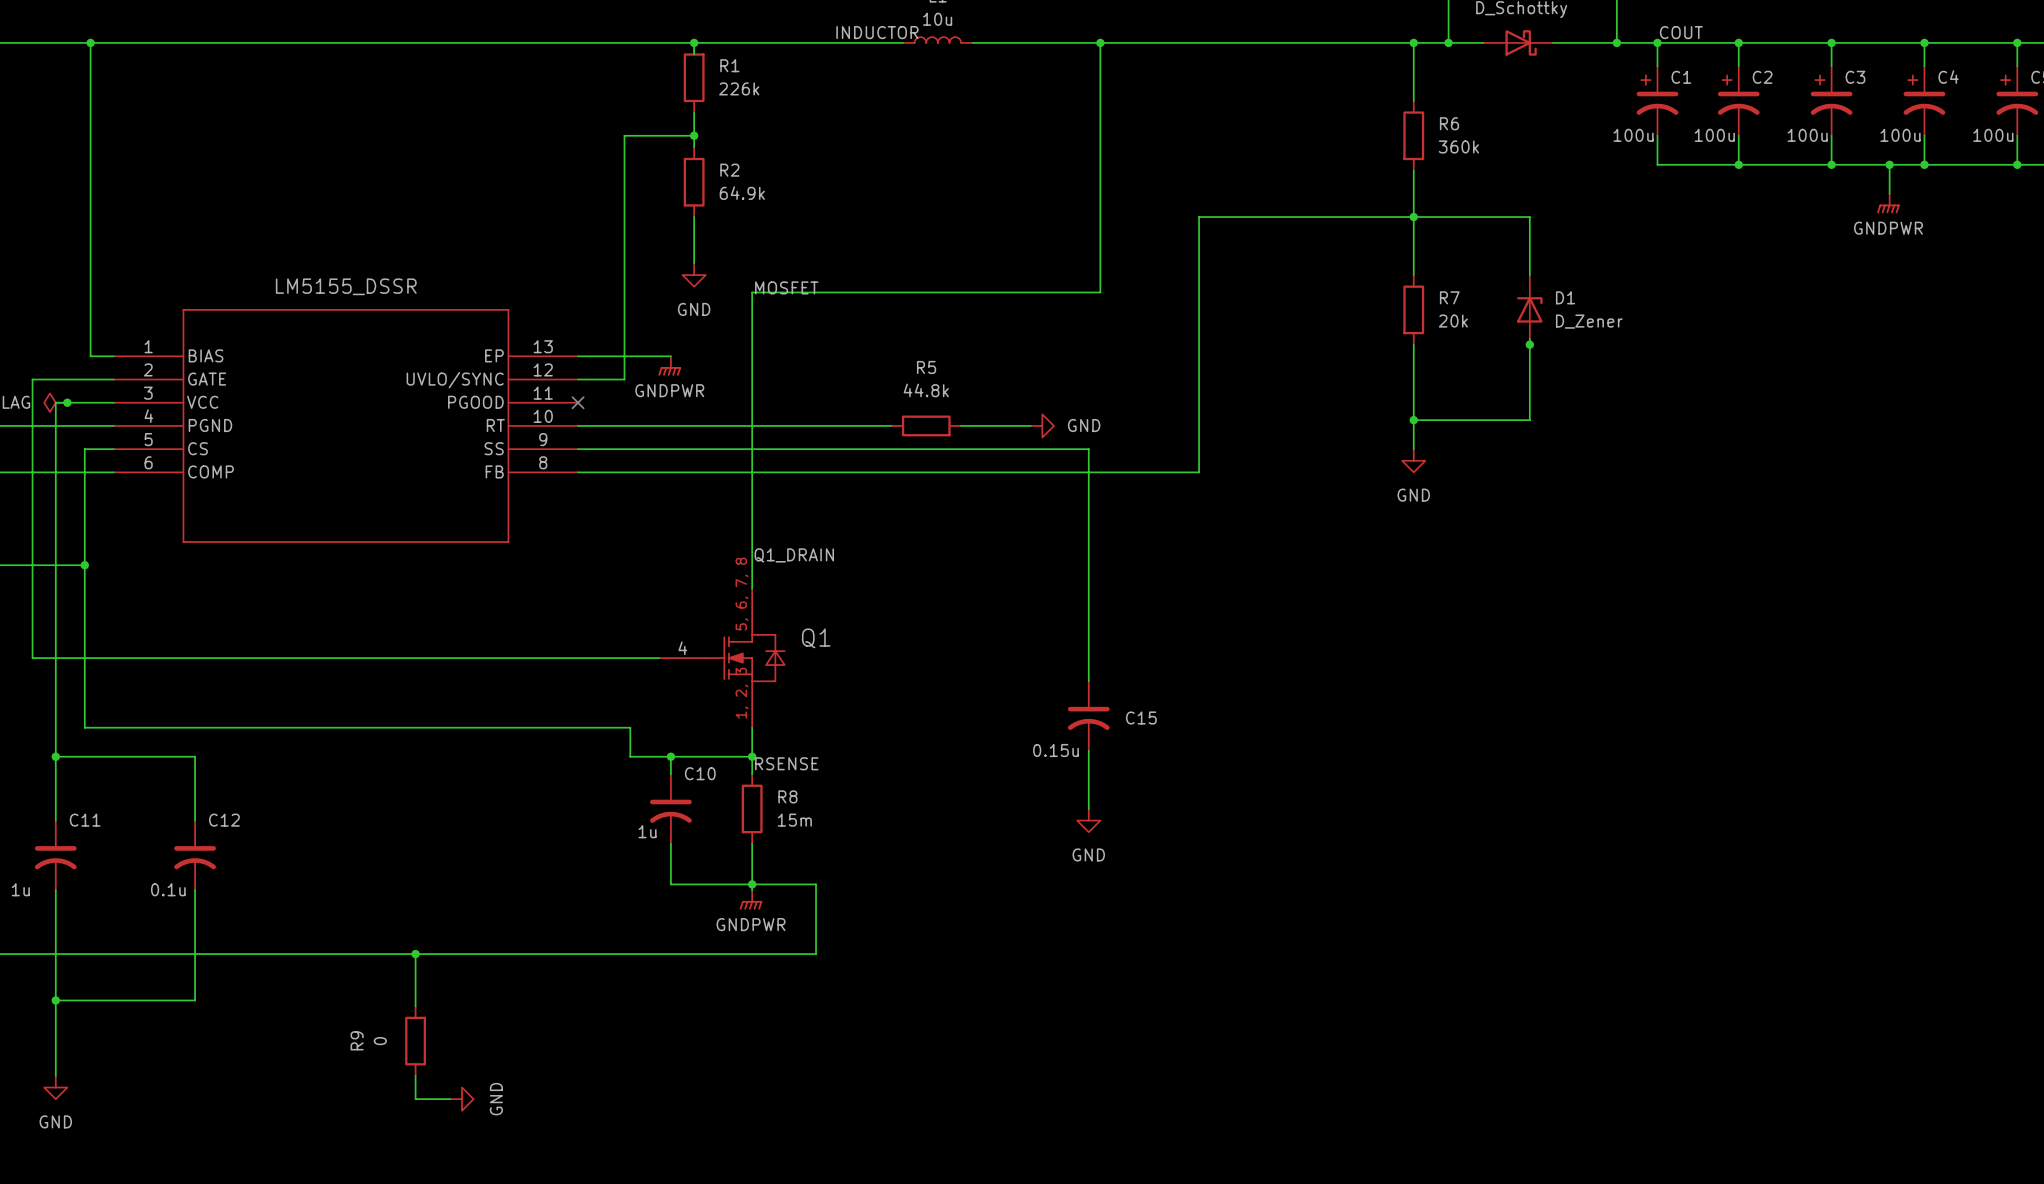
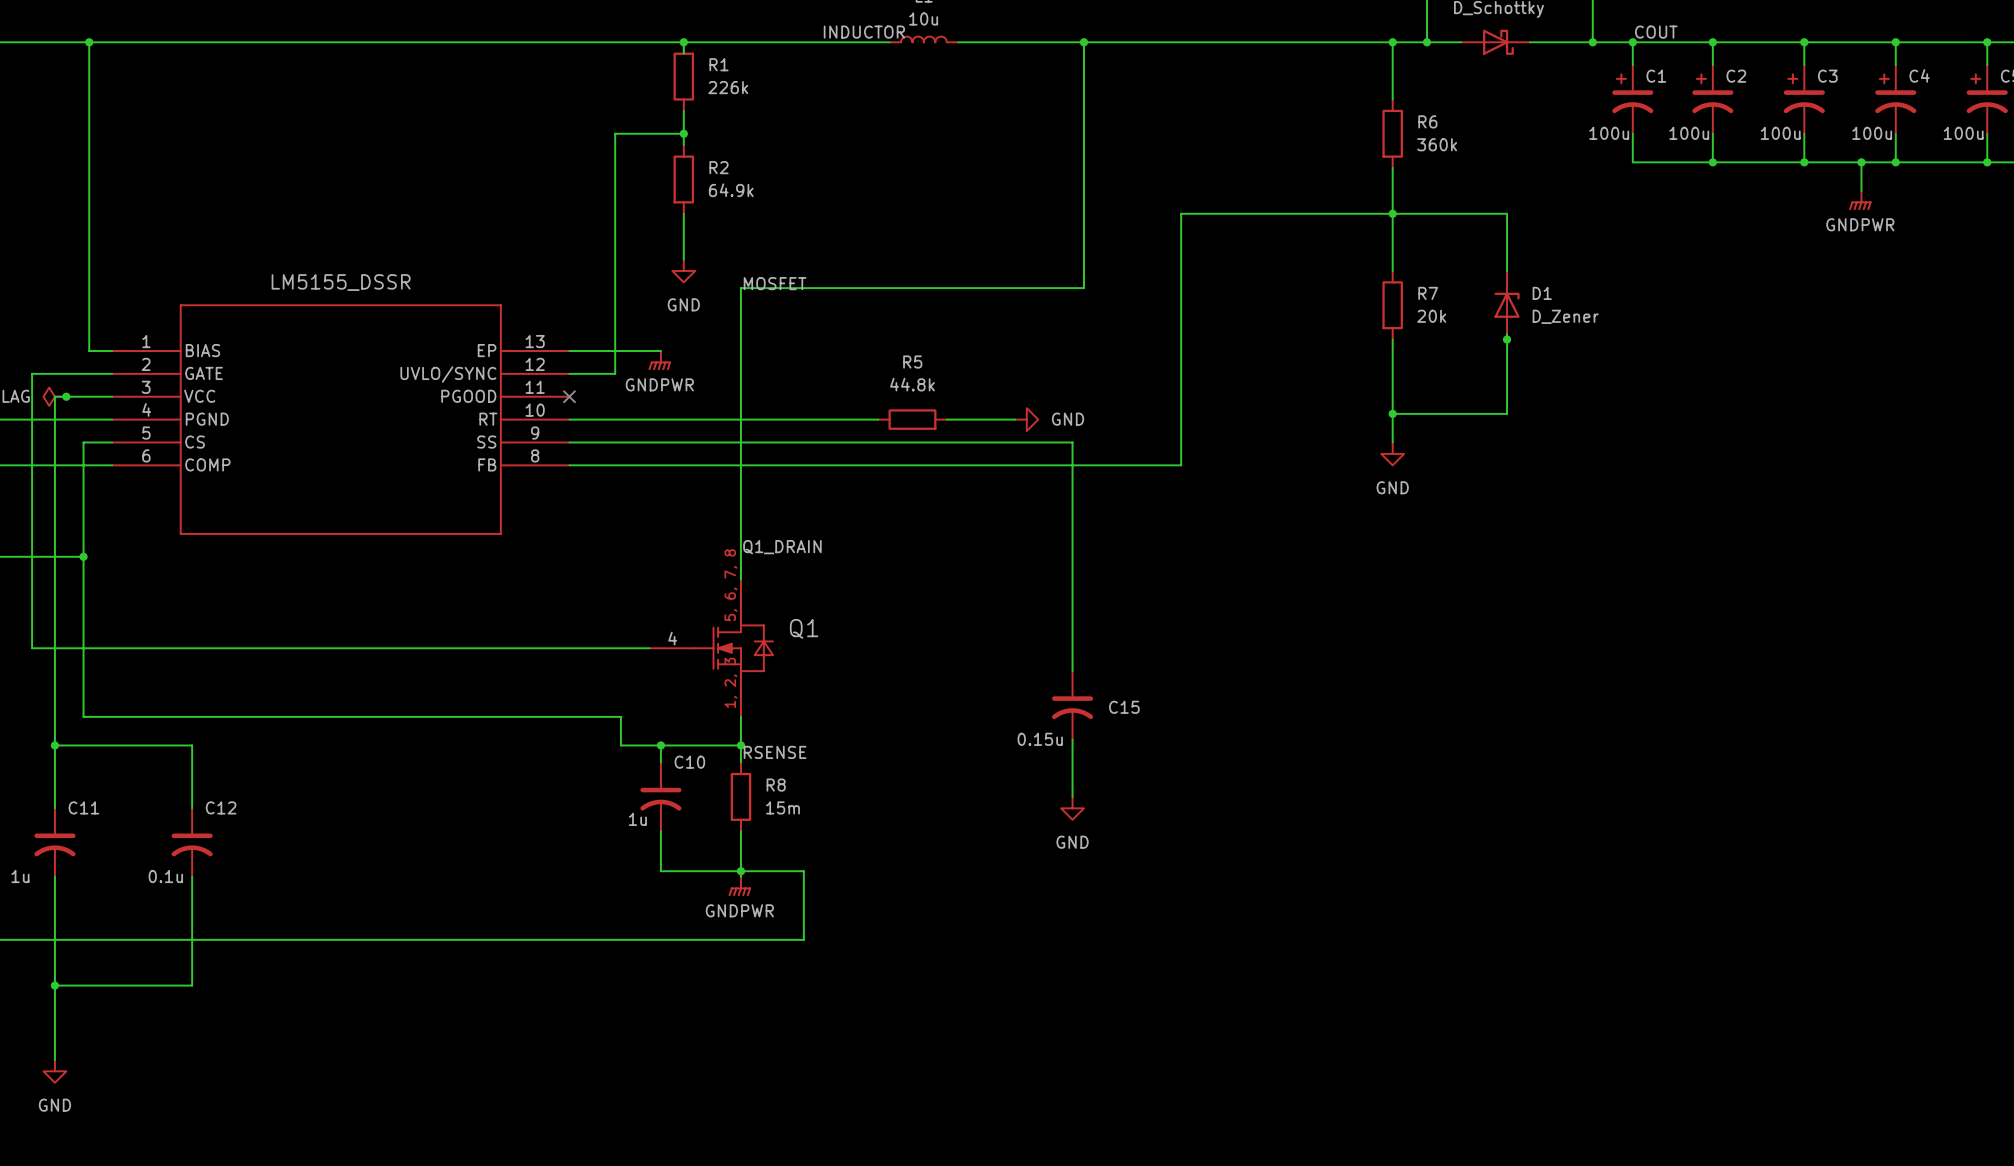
wire: (415, 954) (415, 1006) -> none
junction: (415, 954) -> none
R9: 0 (415, 1041) -> none
wire: (415, 1075) (415, 1099) (450, 1099) -> none
power symbol: GND (462, 1099) -> none

